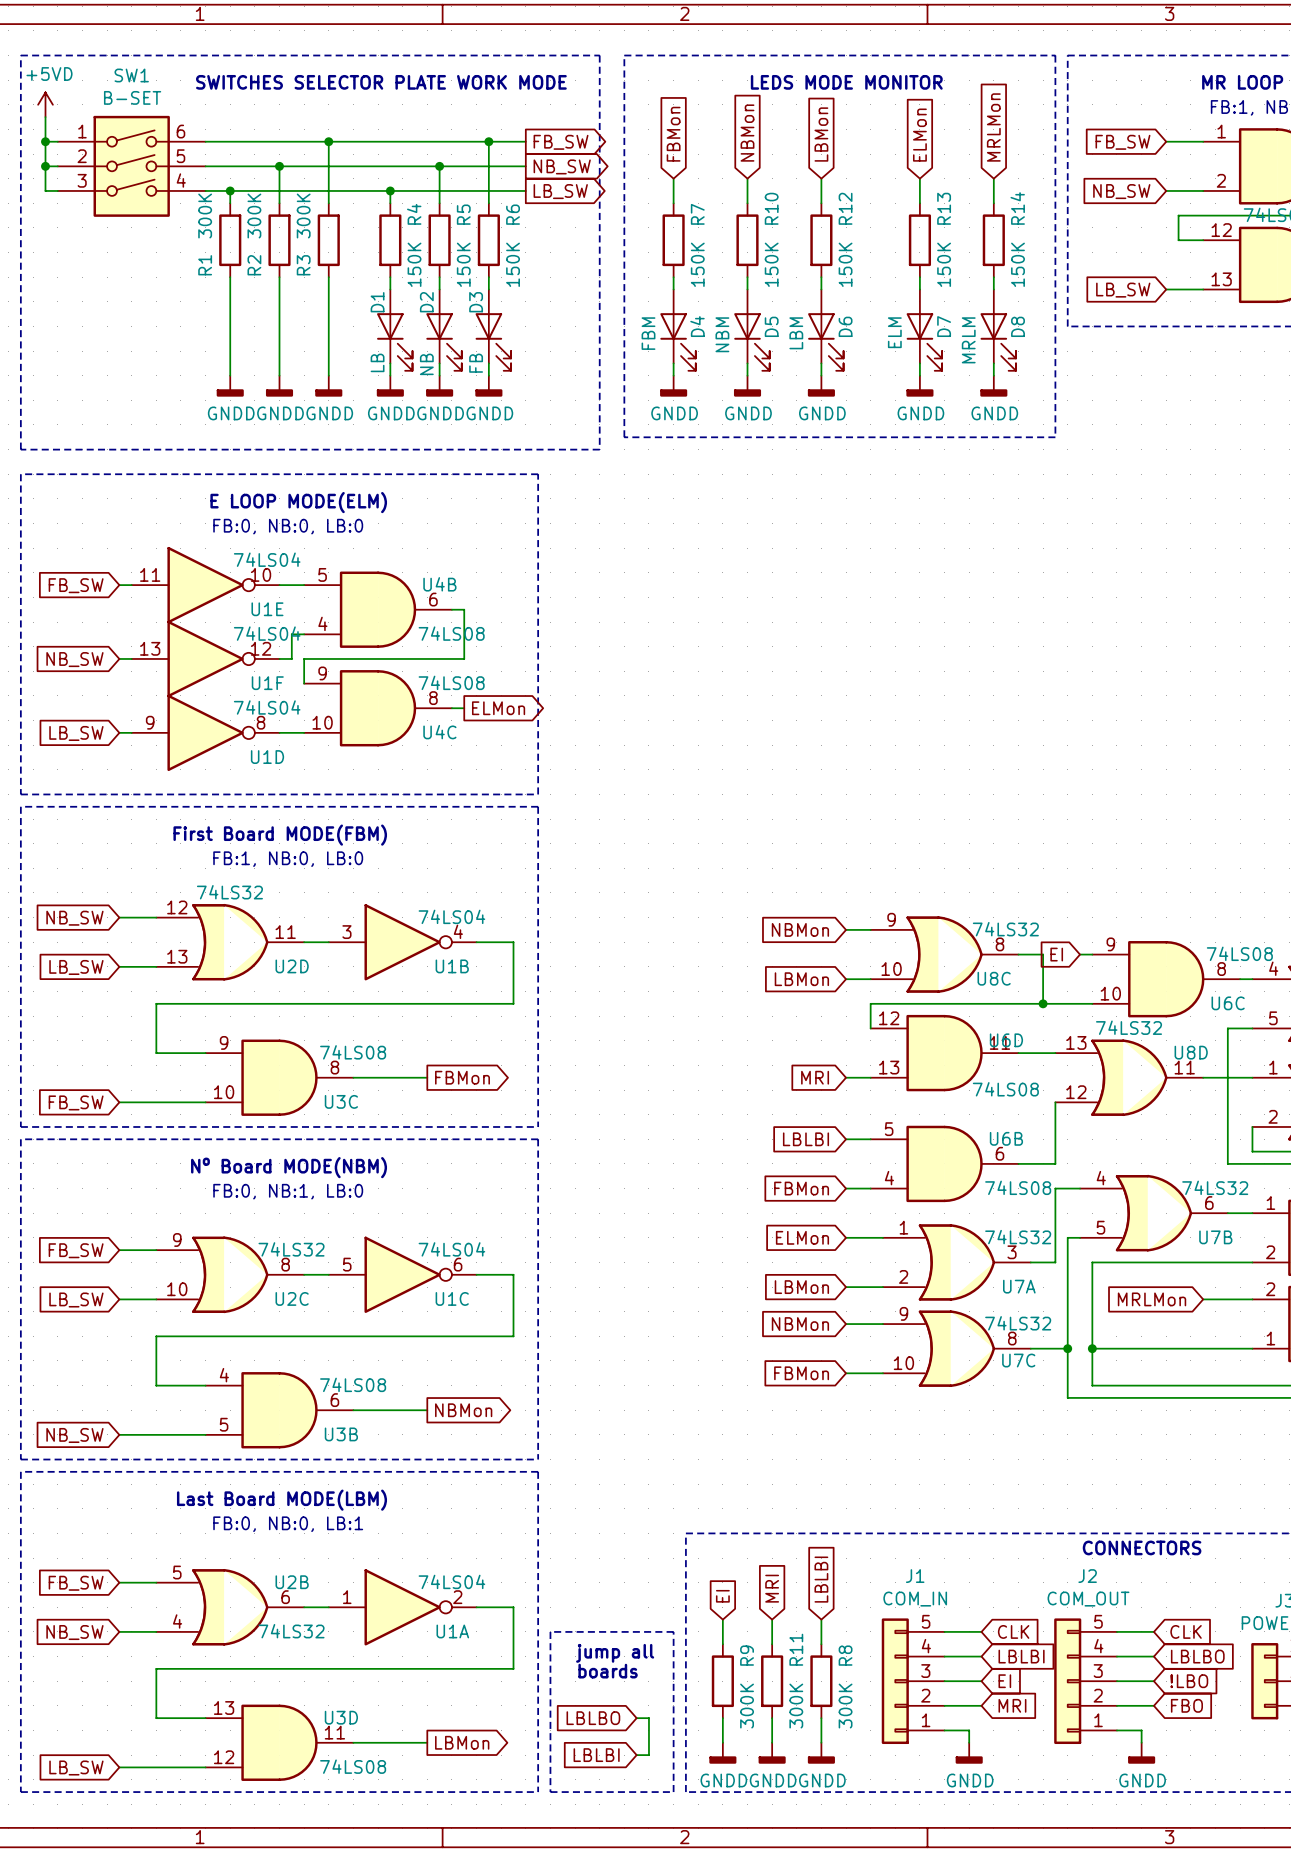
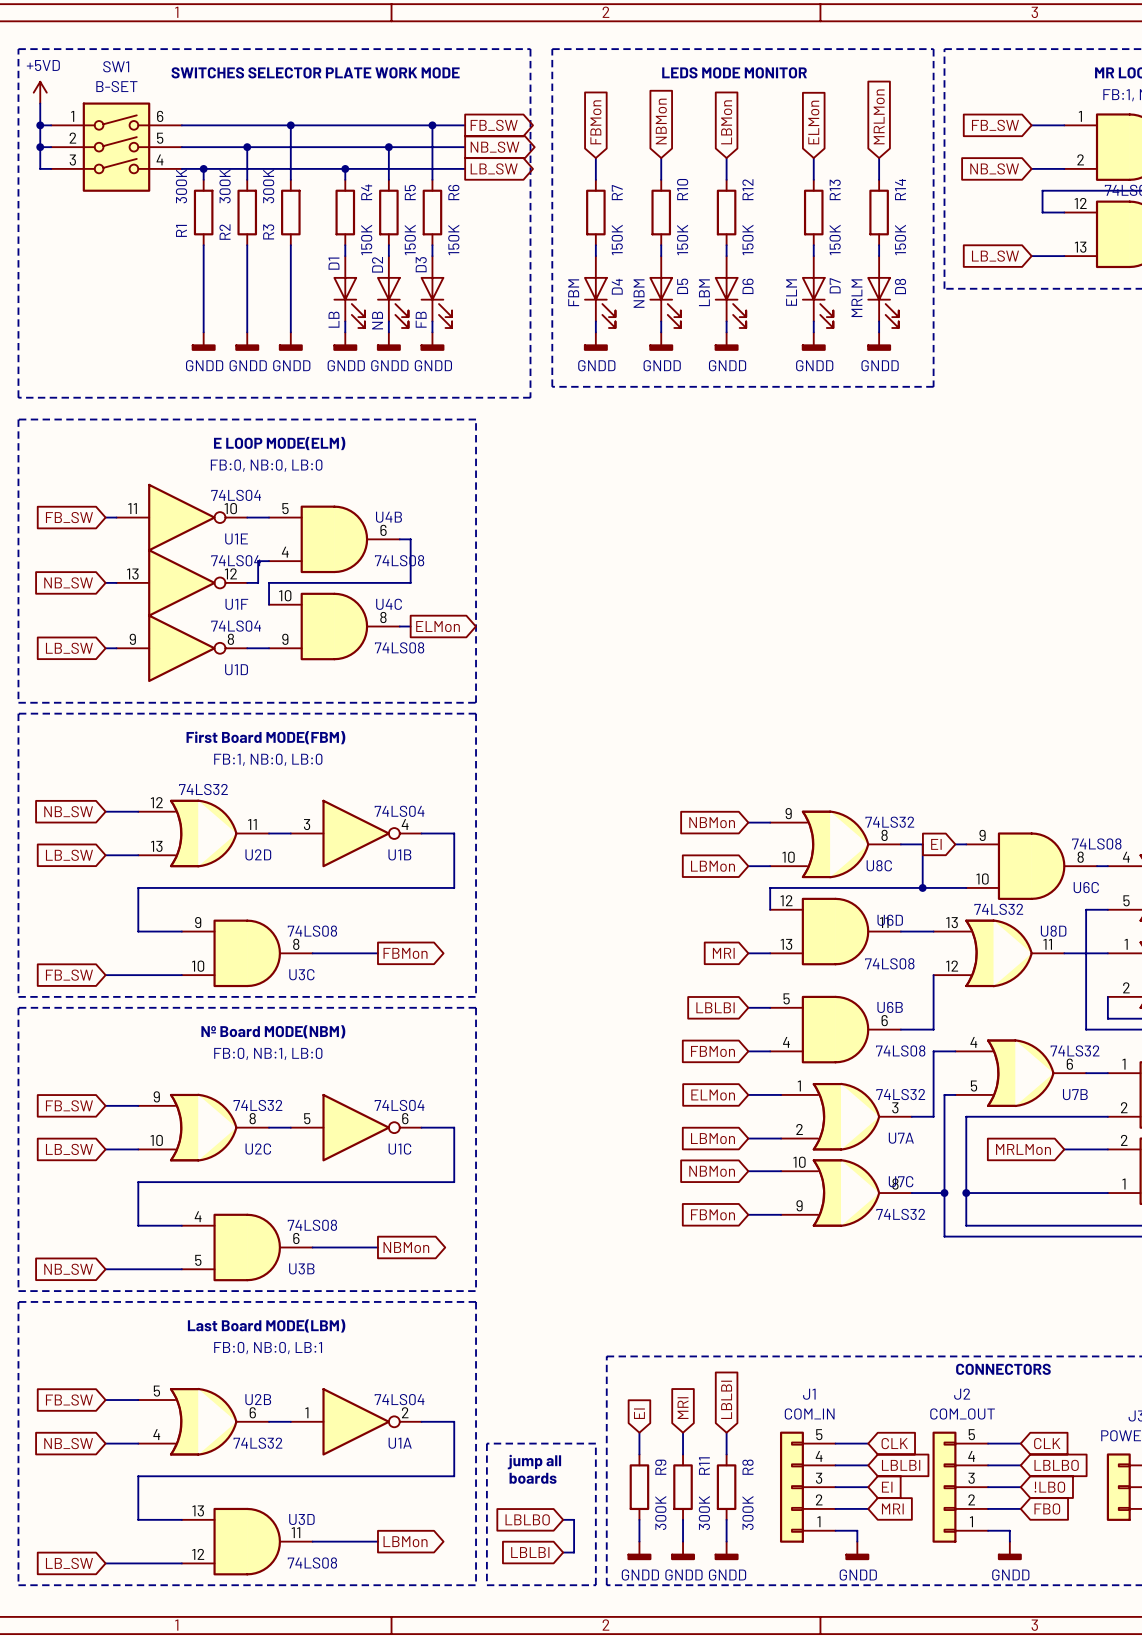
U4C flip: as is (378, 708) -> up-down (334, 626)
U7C flip: as is (956, 1348) -> up-down (846, 1193)

